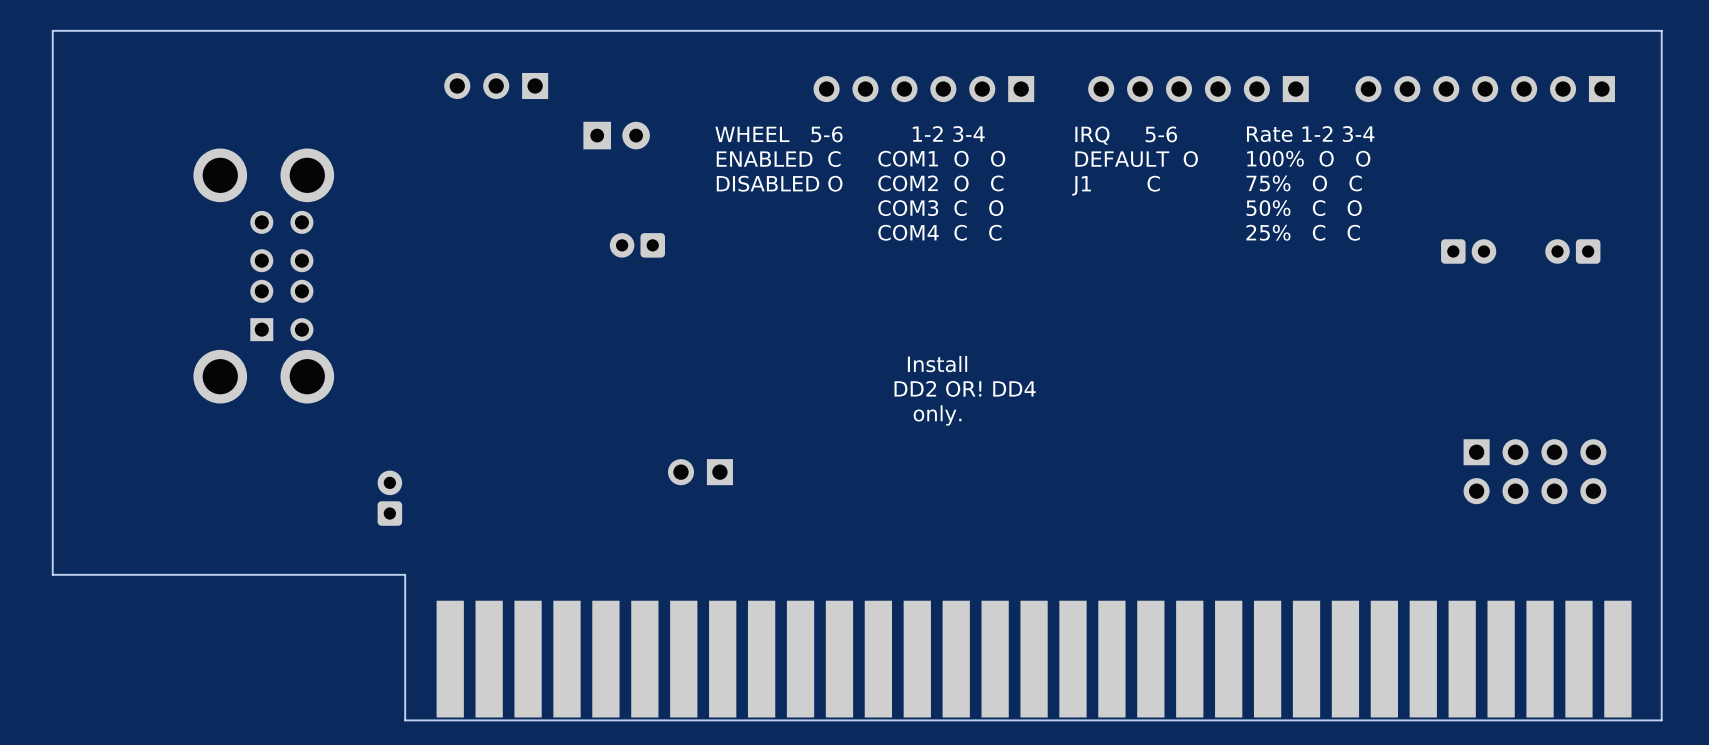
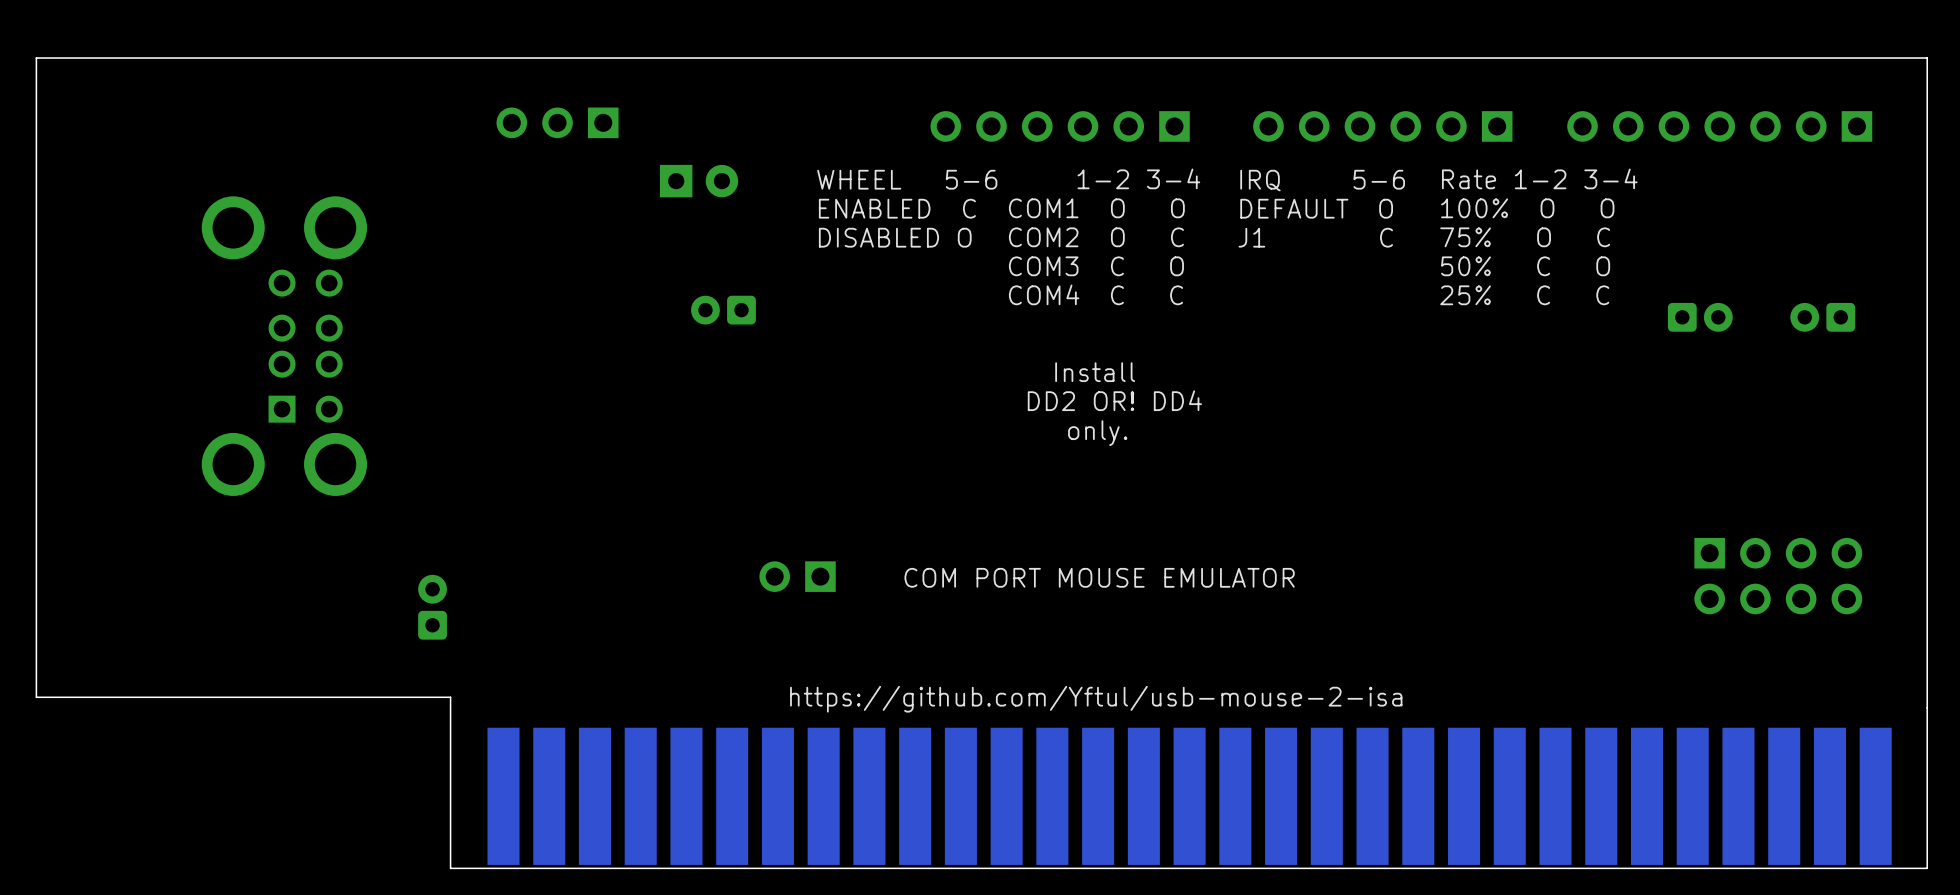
text position: Install (937, 364) -> Install (1095, 372)
text position: DD2 OR! DD4 (965, 388) -> DD2 OR! DD4 (1114, 400)
text position: only. (937, 415) -> only. (1097, 433)
text: none -> COM PORT MOUSE EMULATOR (1099, 577)
text: none -> https://github.com/Yftul/usb-mouse-2-isa (1096, 699)

